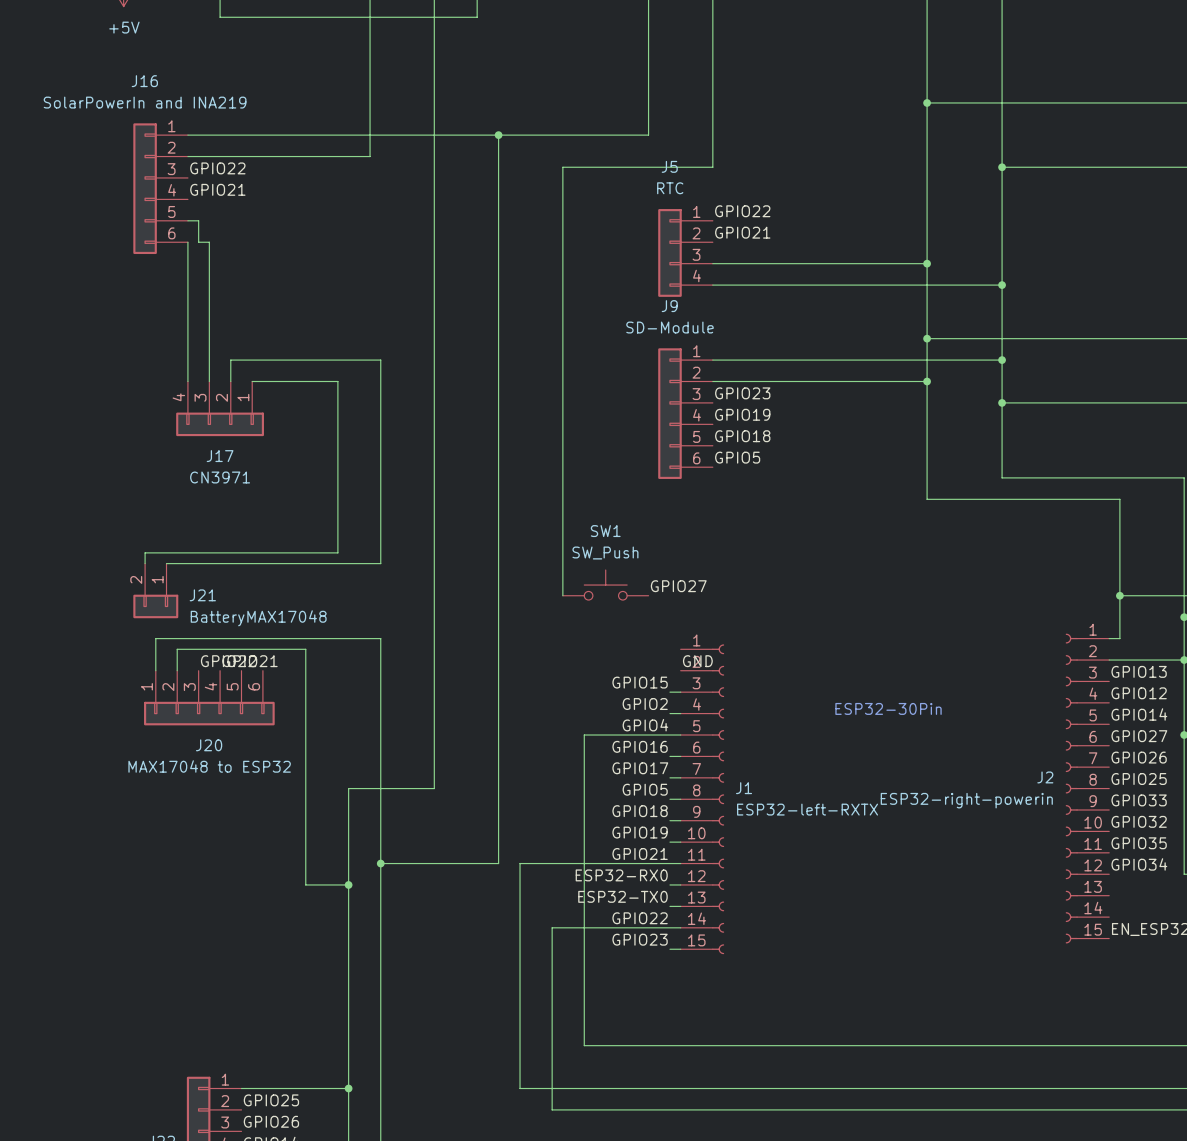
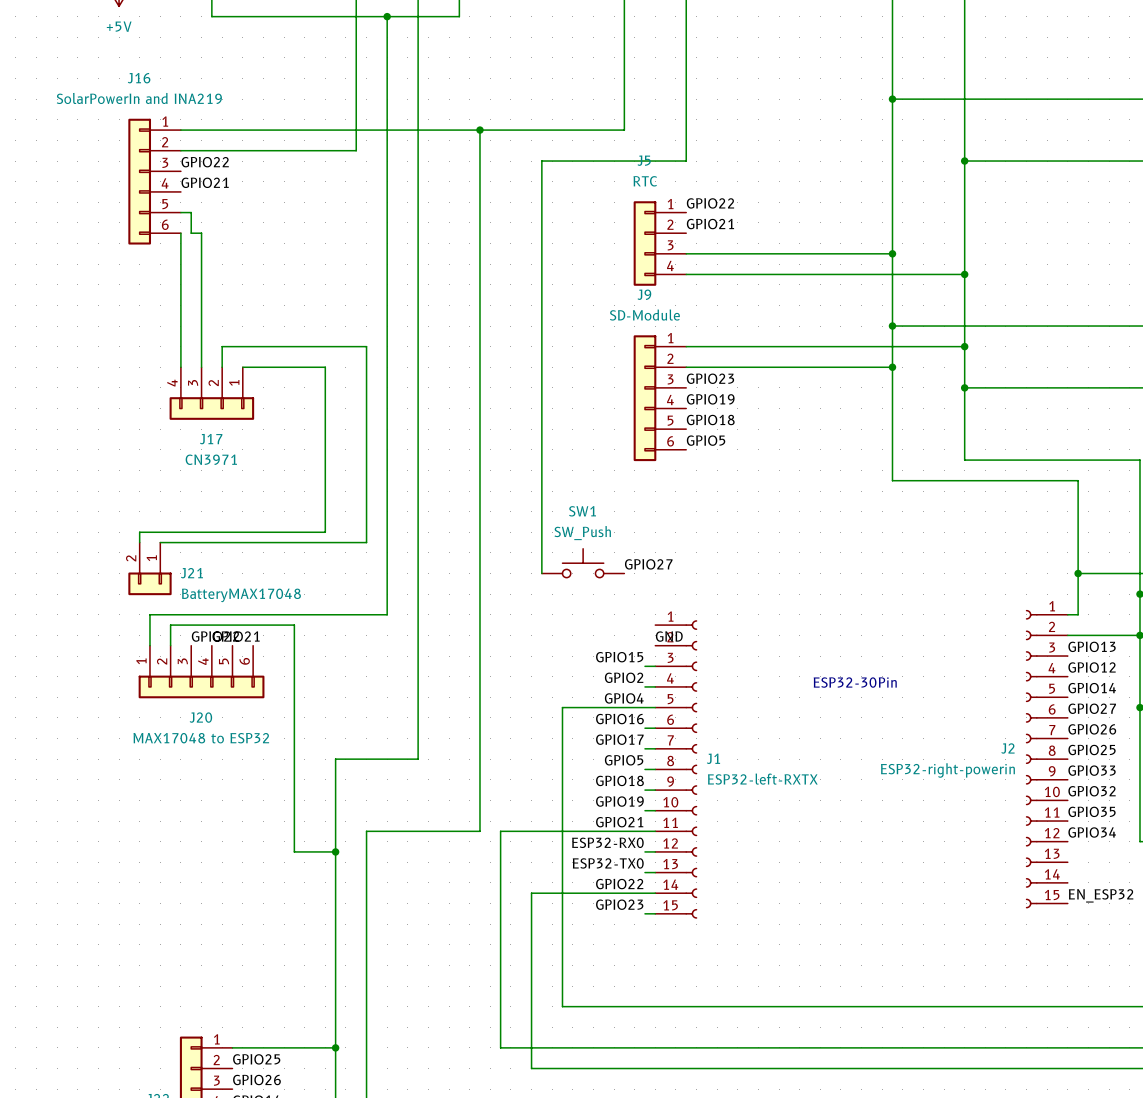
junction: none -> (387, 16)
wire: (380, 638) (380, 863) -> (366, 614) (387, 614) (387, 16)
junction: (380, 863) -> none

